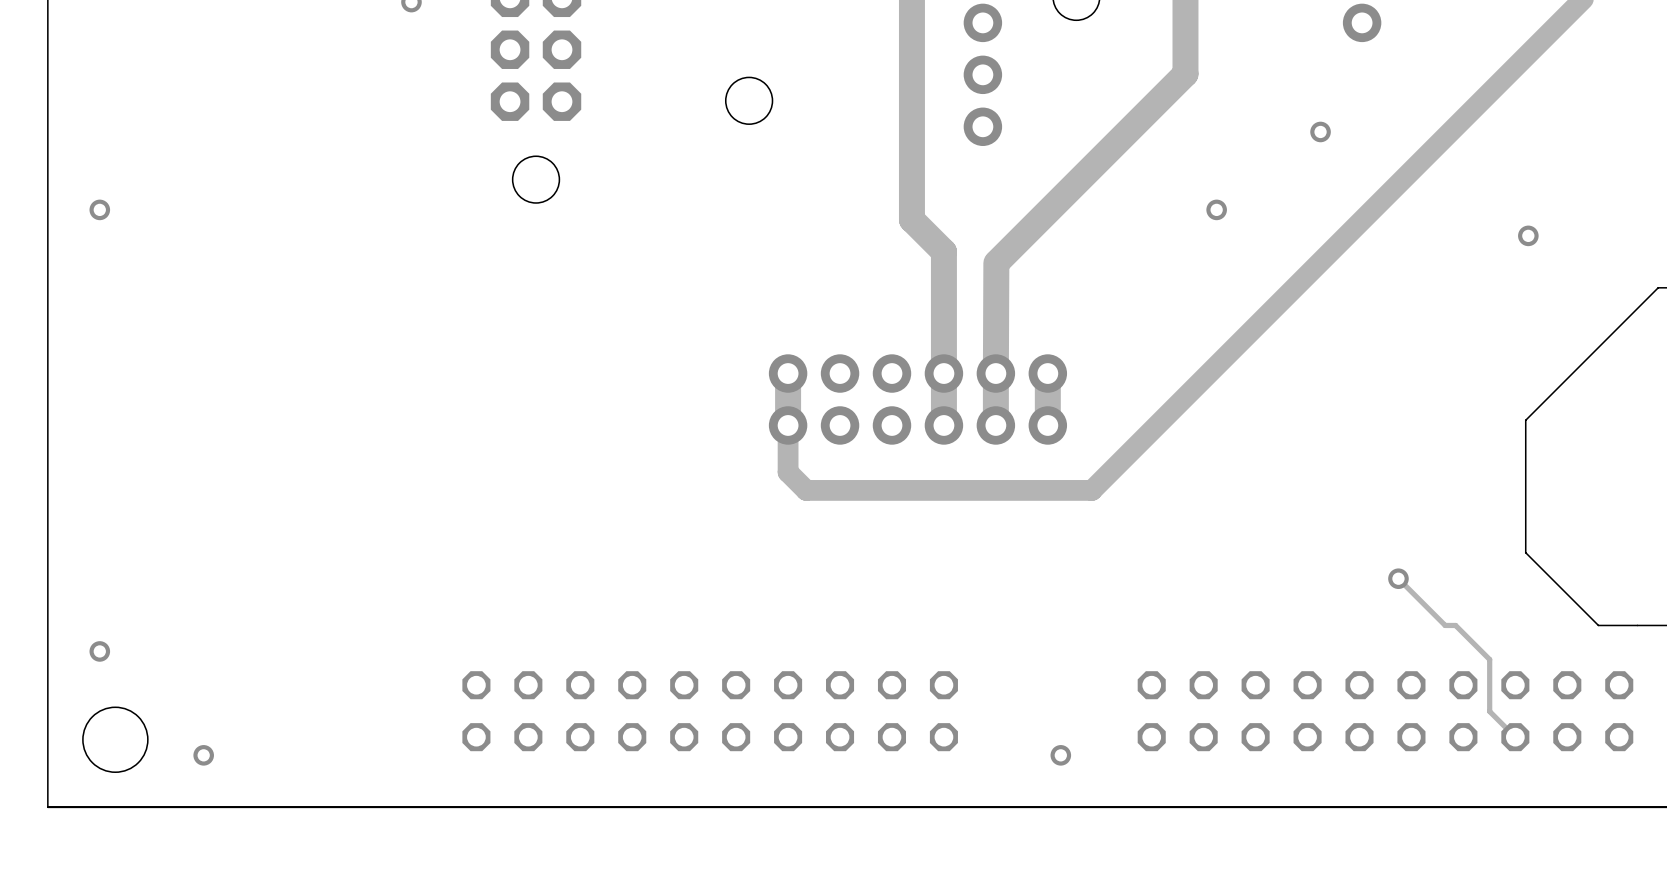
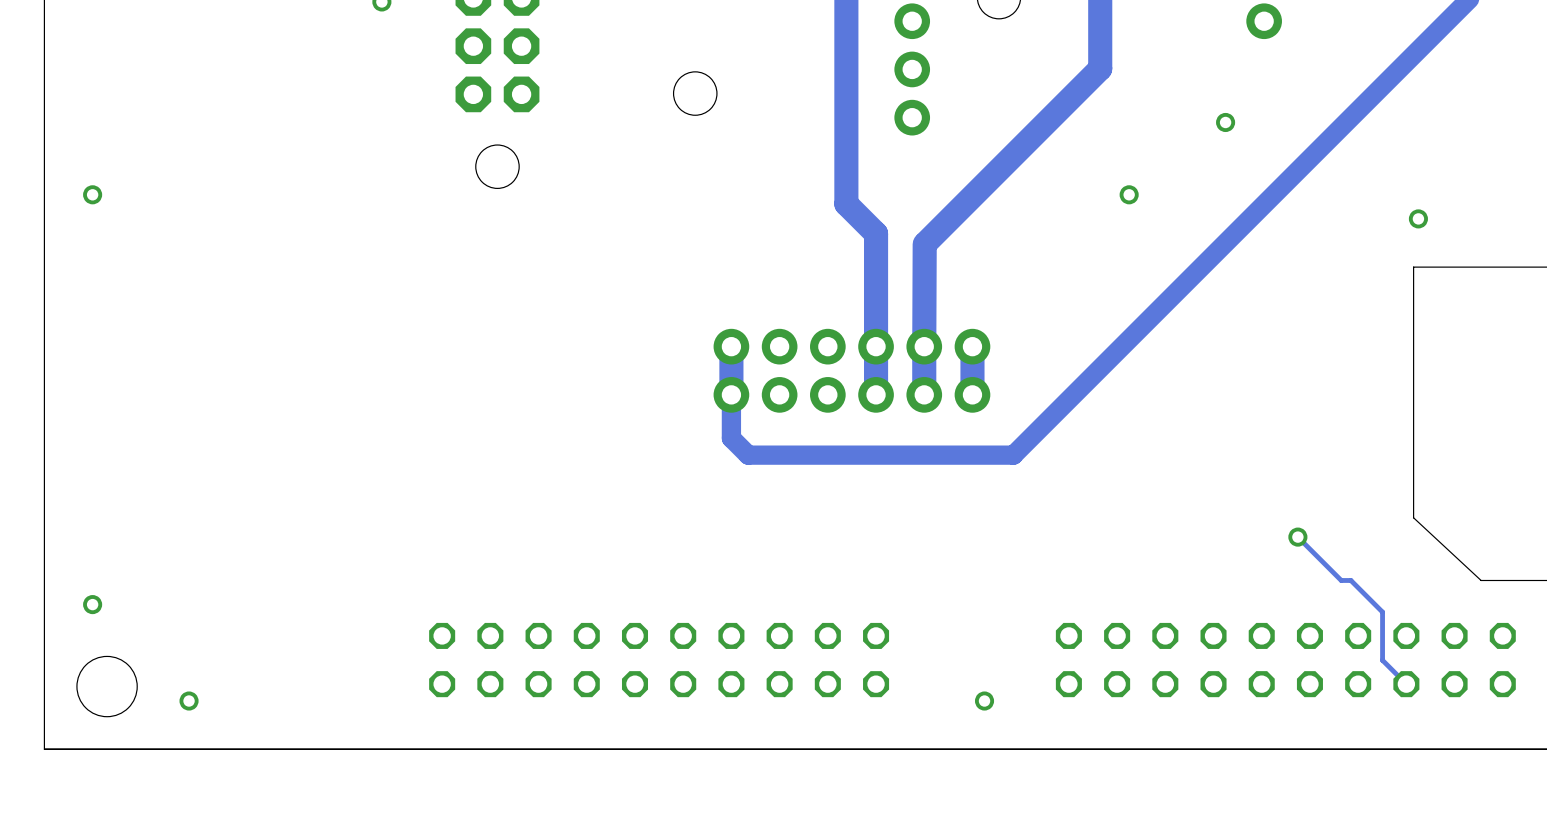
board edge: (1658, 287) (1525, 420) (1525, 552) (1598, 625) -> (1538, 267) (1413, 267) (1413, 517) (1481, 580) (1483, 580)

